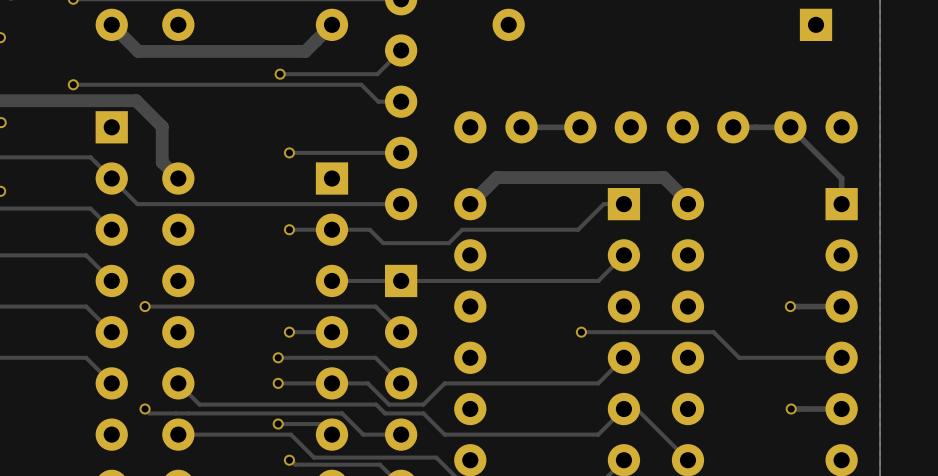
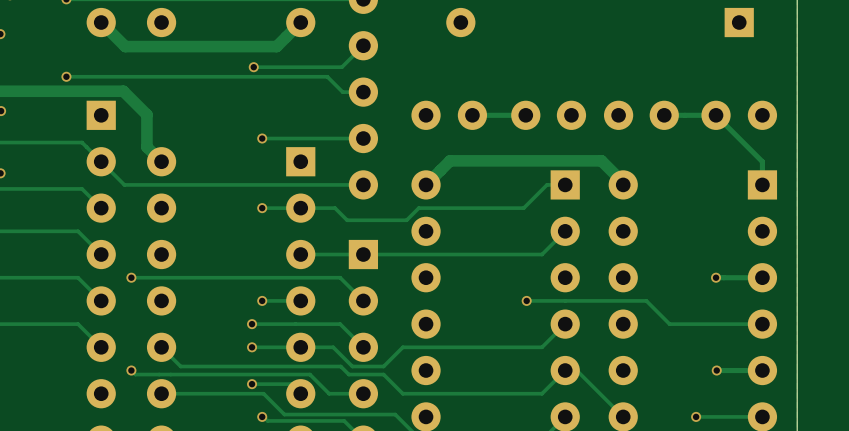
via: none -> (696, 416)
track: none -> (762, 416) (696, 416)

